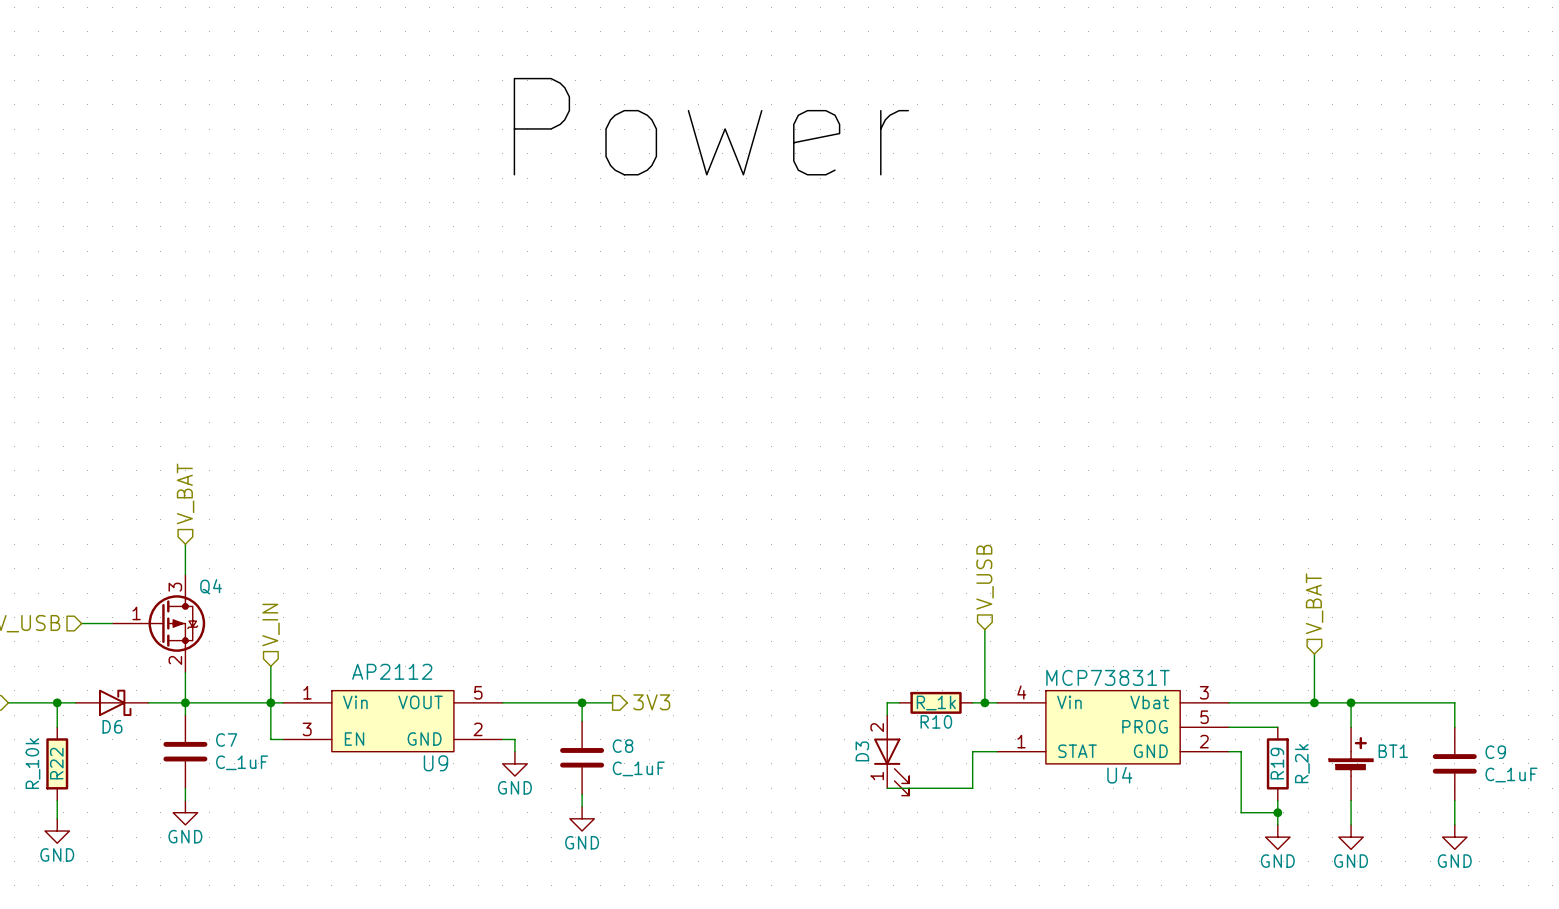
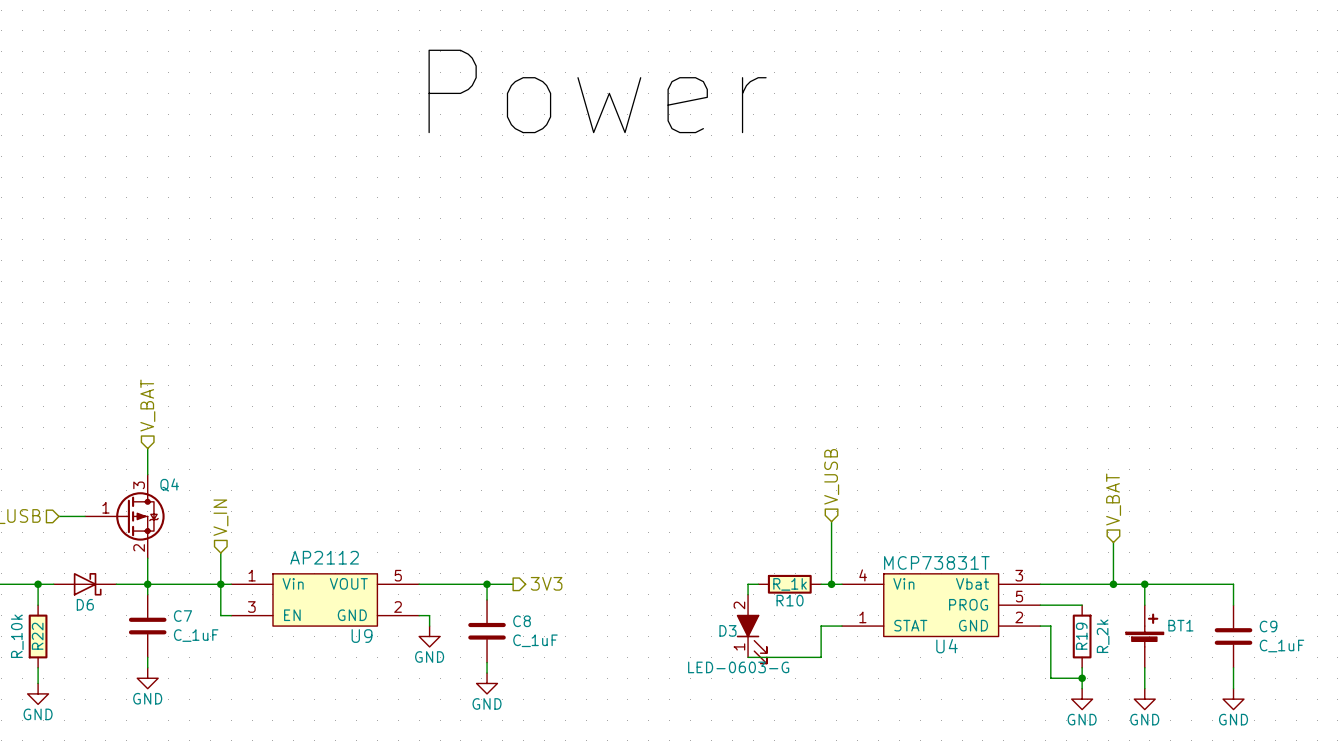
D3 symbol: [874, 715, 910, 796] -> [736, 594, 767, 664]
D3 name rotation: 0° (862, 751) -> 90° clockwise (727, 630)
D3 value: none -> LED-0603-G (738, 667)

